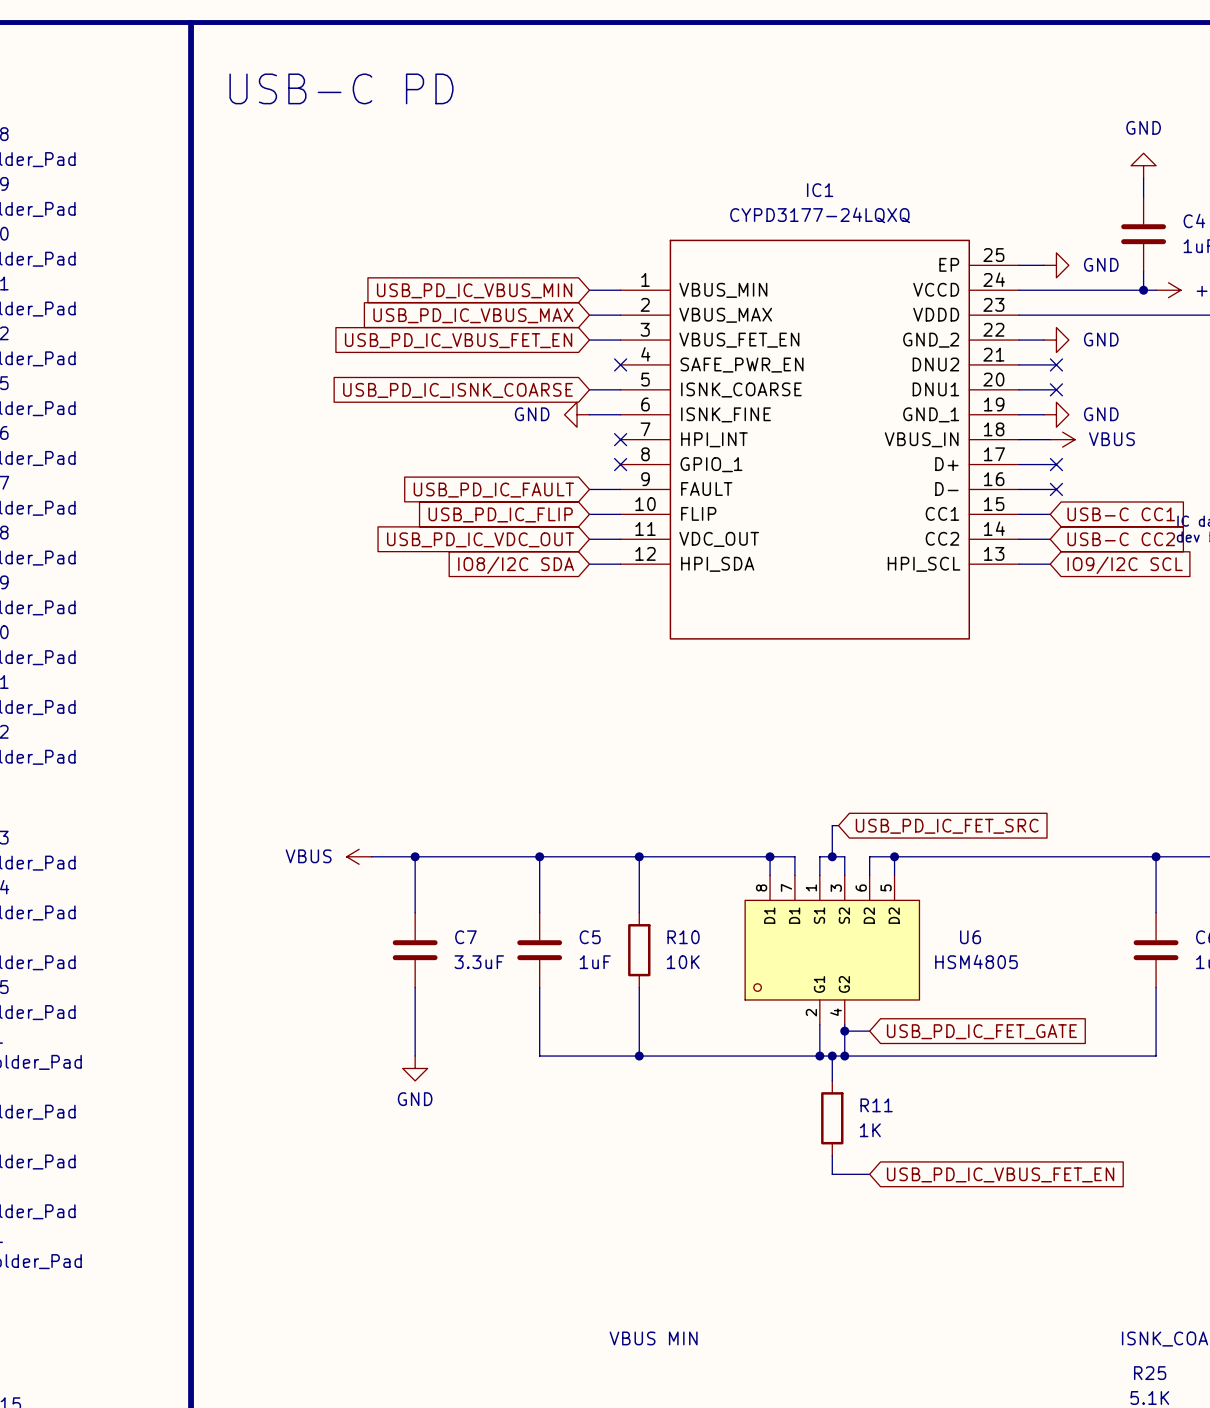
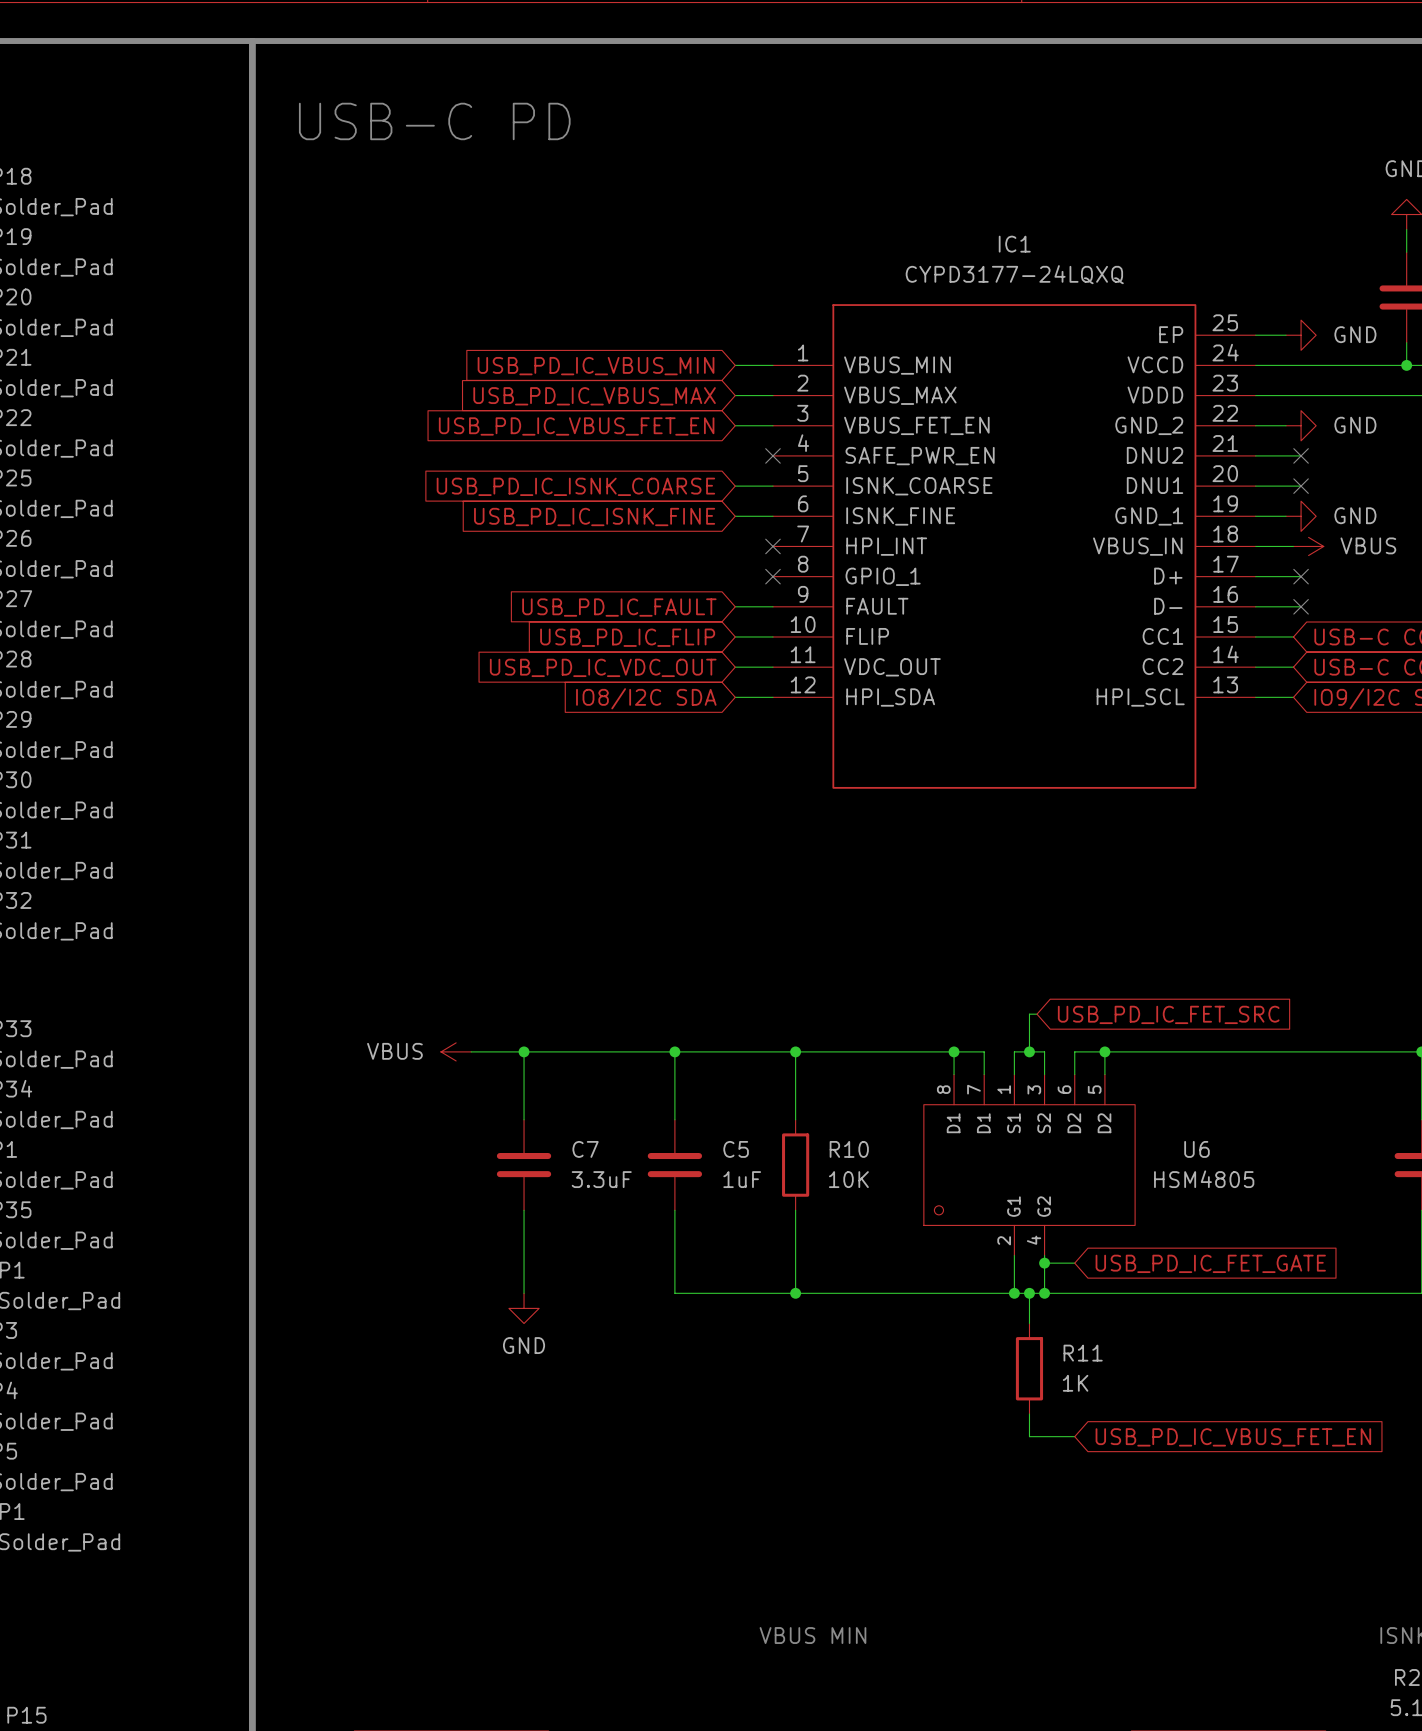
power symbol: GND (577, 414) -> none
global label: none -> USB_PD_IC_ISNK_FINE (594, 517)

